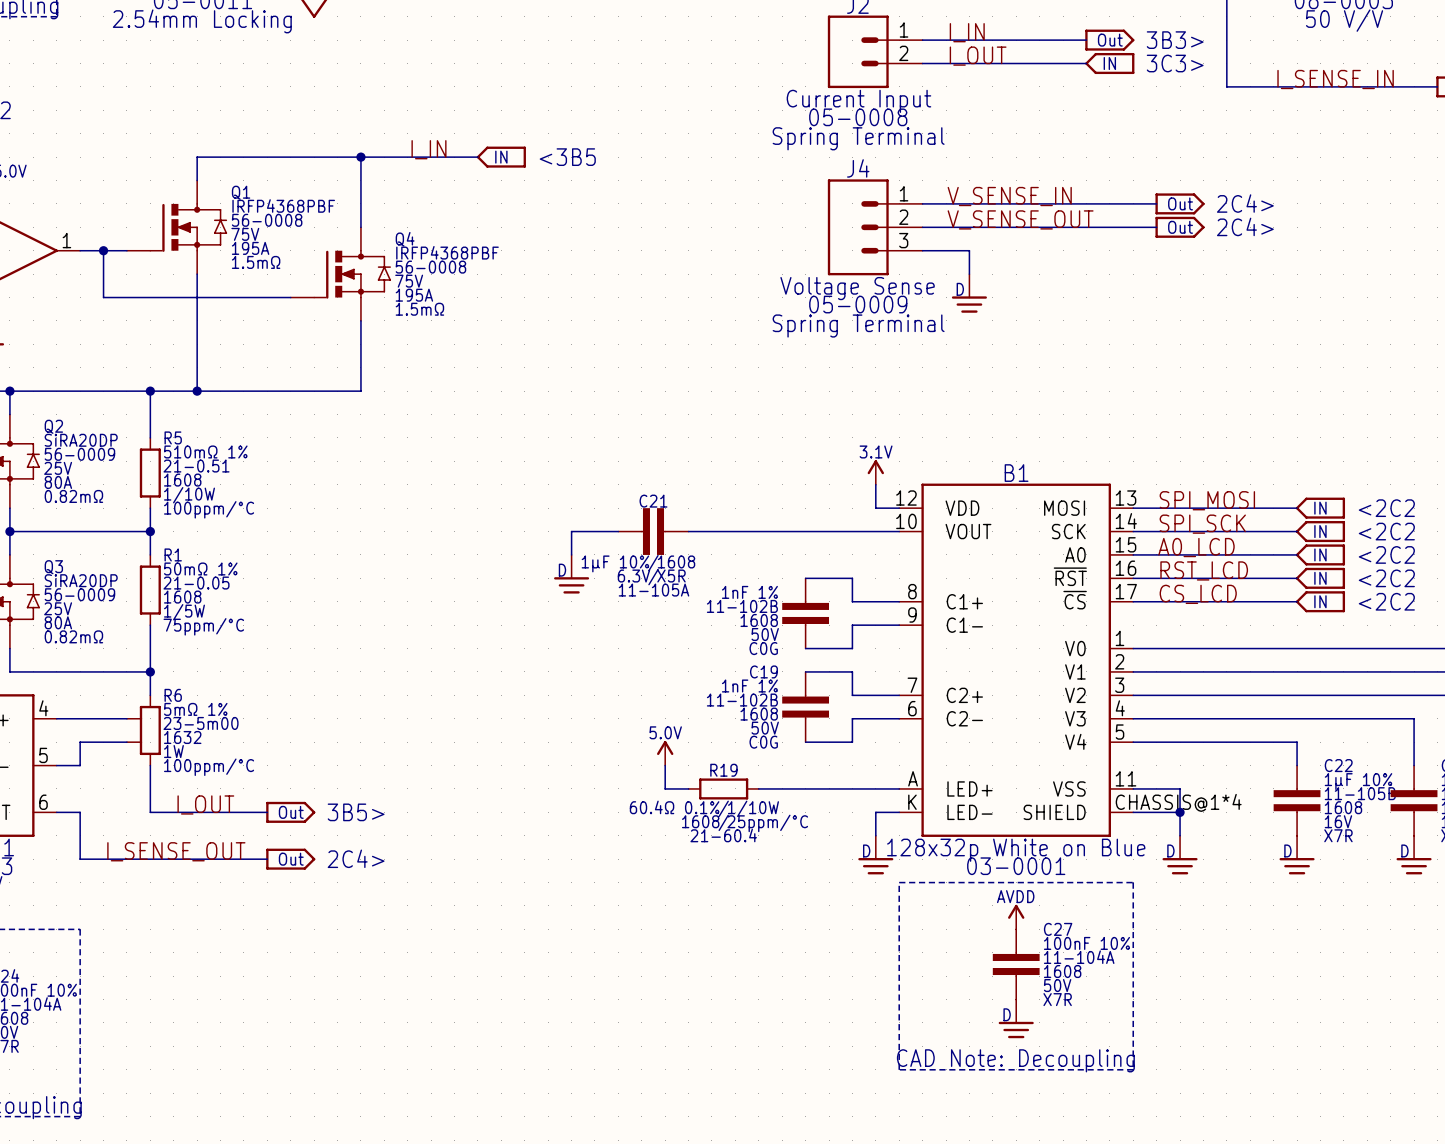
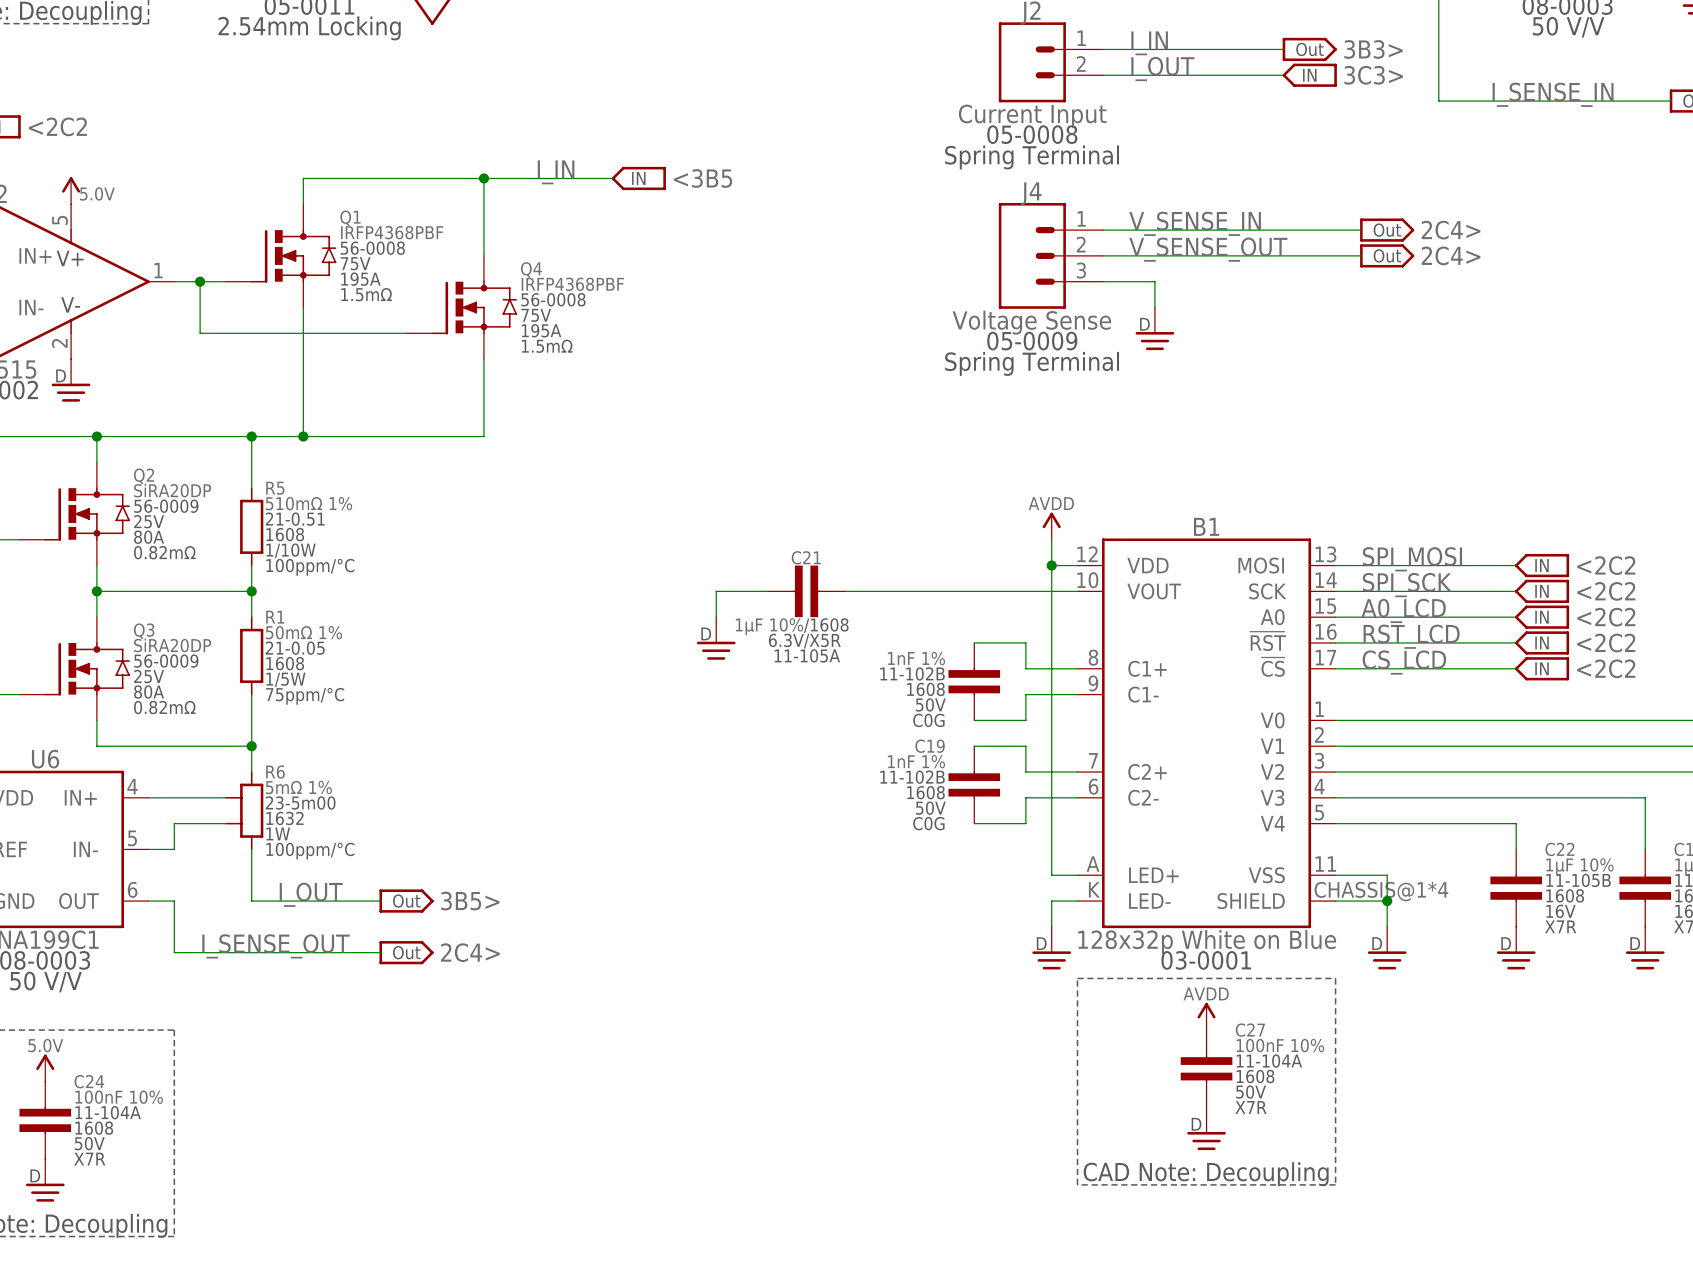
power symbol: 3.1V (875, 472) -> AVDD (1051, 526)
junction: none -> (1051, 565)
power symbol: 5.0V (665, 753) -> none
wire: (665, 765) (665, 788) (688, 788) -> none
R19: 60.4Ω 0.1% (723, 788) -> none
wire: (758, 788) (875, 788) -> (1051, 565) (1051, 875)

